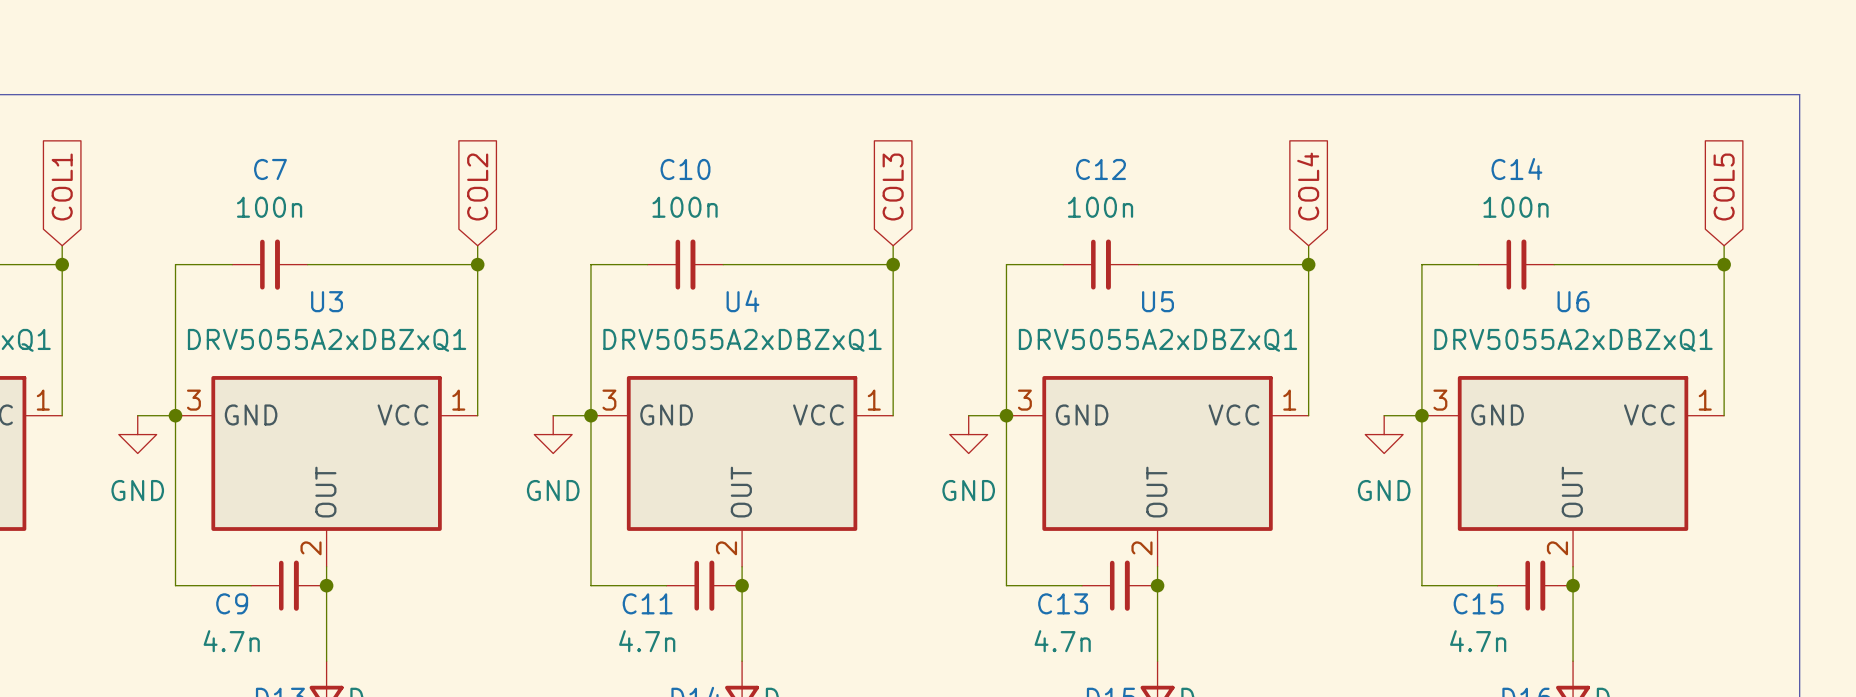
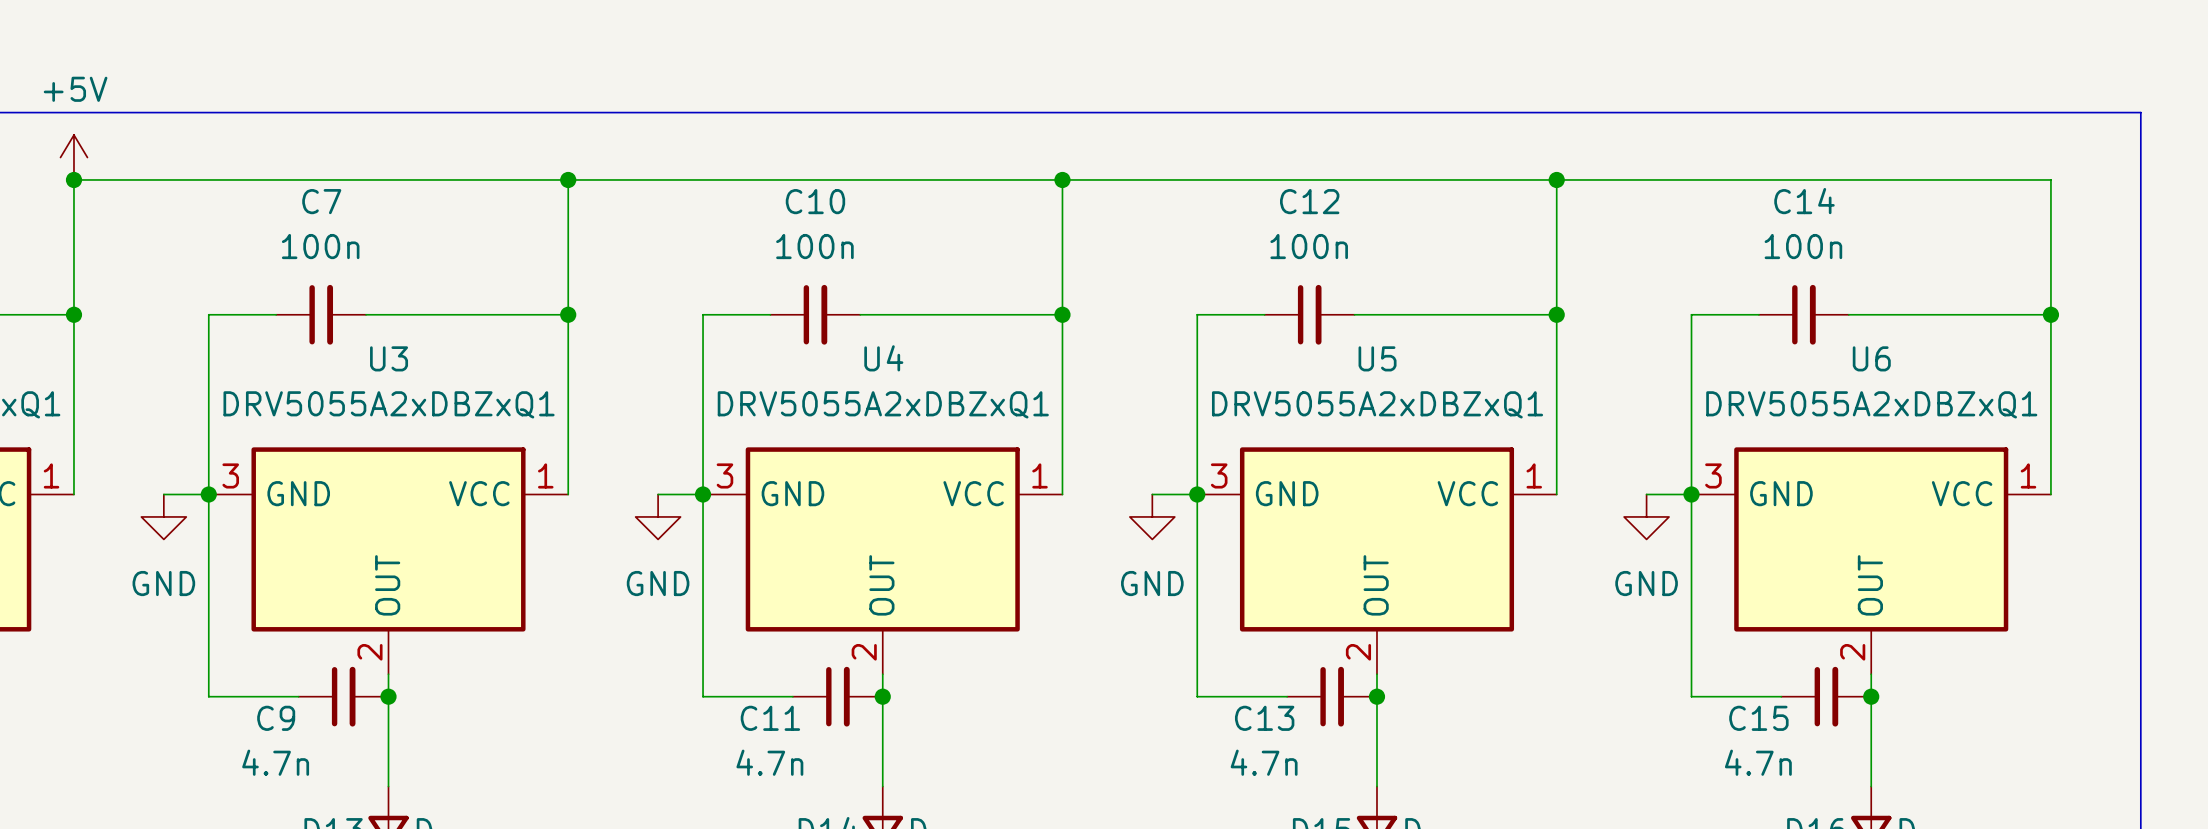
power symbol: none -> +5V (73, 157)
junction: none -> (73, 179)
wire: none -> (568, 179) (568, 292)
junction: none -> (568, 179)
wire: none -> (1062, 179) (1062, 292)
junction: none -> (1062, 179)
wire: none -> (1556, 179) (1556, 292)
junction: none -> (1556, 179)
global label: COL4 (1308, 186) -> none
global label: COL1 (62, 187) -> none
global label: COL2 (477, 187) -> none
global label: COL3 (893, 187) -> none
global label: COL5 (1724, 187) -> none
wire: none -> (73, 292) (73, 179) (2050, 179) (2050, 292)

